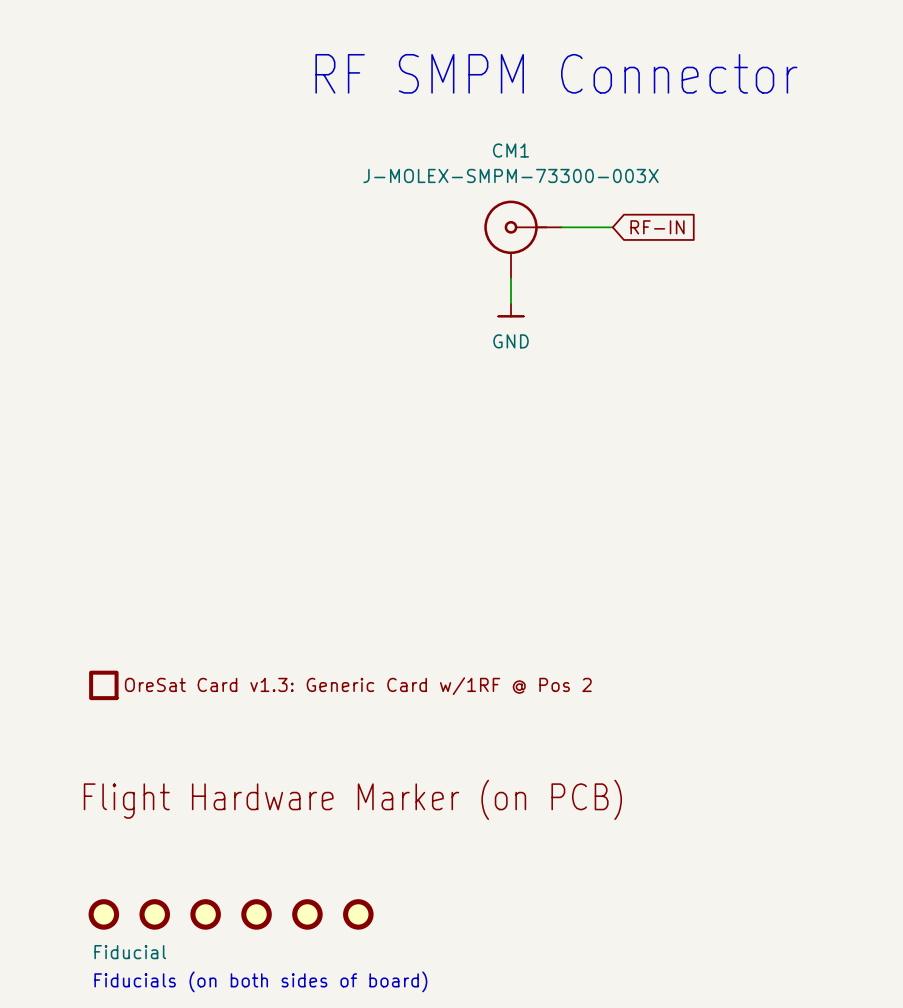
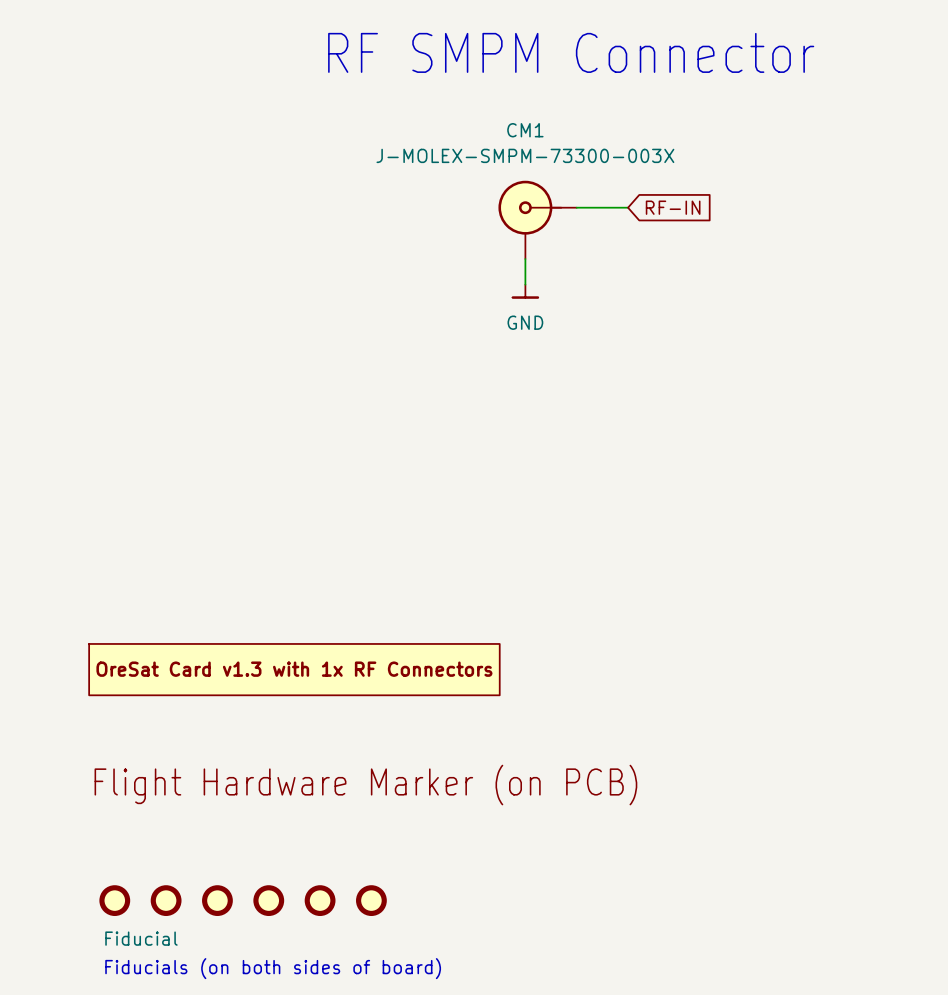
CM1 symbol: [484, 200, 562, 279] -> [498, 180, 577, 260]
part: (103, 685) -> none
part: none -> (294, 669)

